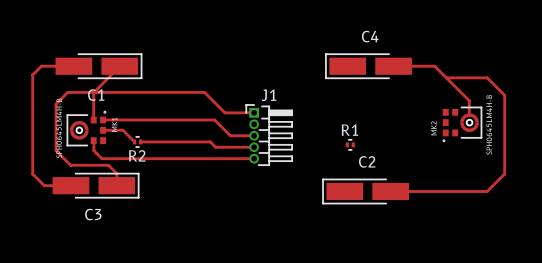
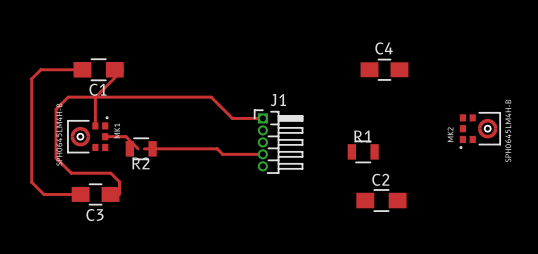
C1 footprint: [55, 53, 143, 79] -> [73, 58, 124, 82]
C4 footprint: [325, 53, 412, 79] -> [360, 58, 409, 81]
top track: (393, 66) (434, 66) (469, 100) (469, 115) -> none
top track: (446, 77) (487, 77) (504, 95) (504, 174) (487, 191) (390, 191) -> none
top track: (103, 119) (214, 119) (230, 135) (254, 135) -> none
R2 footprint: [133, 136, 143, 148] -> [125, 137, 157, 161]
R1 footprint: [345, 139, 355, 151] -> [347, 140, 379, 164]
top track: (93, 140) (93, 150) (101, 158) (254, 158) -> none
C3 footprint: [52, 172, 140, 199] -> [71, 183, 120, 206]
C2 footprint: [322, 178, 410, 205] -> [356, 189, 407, 212]

